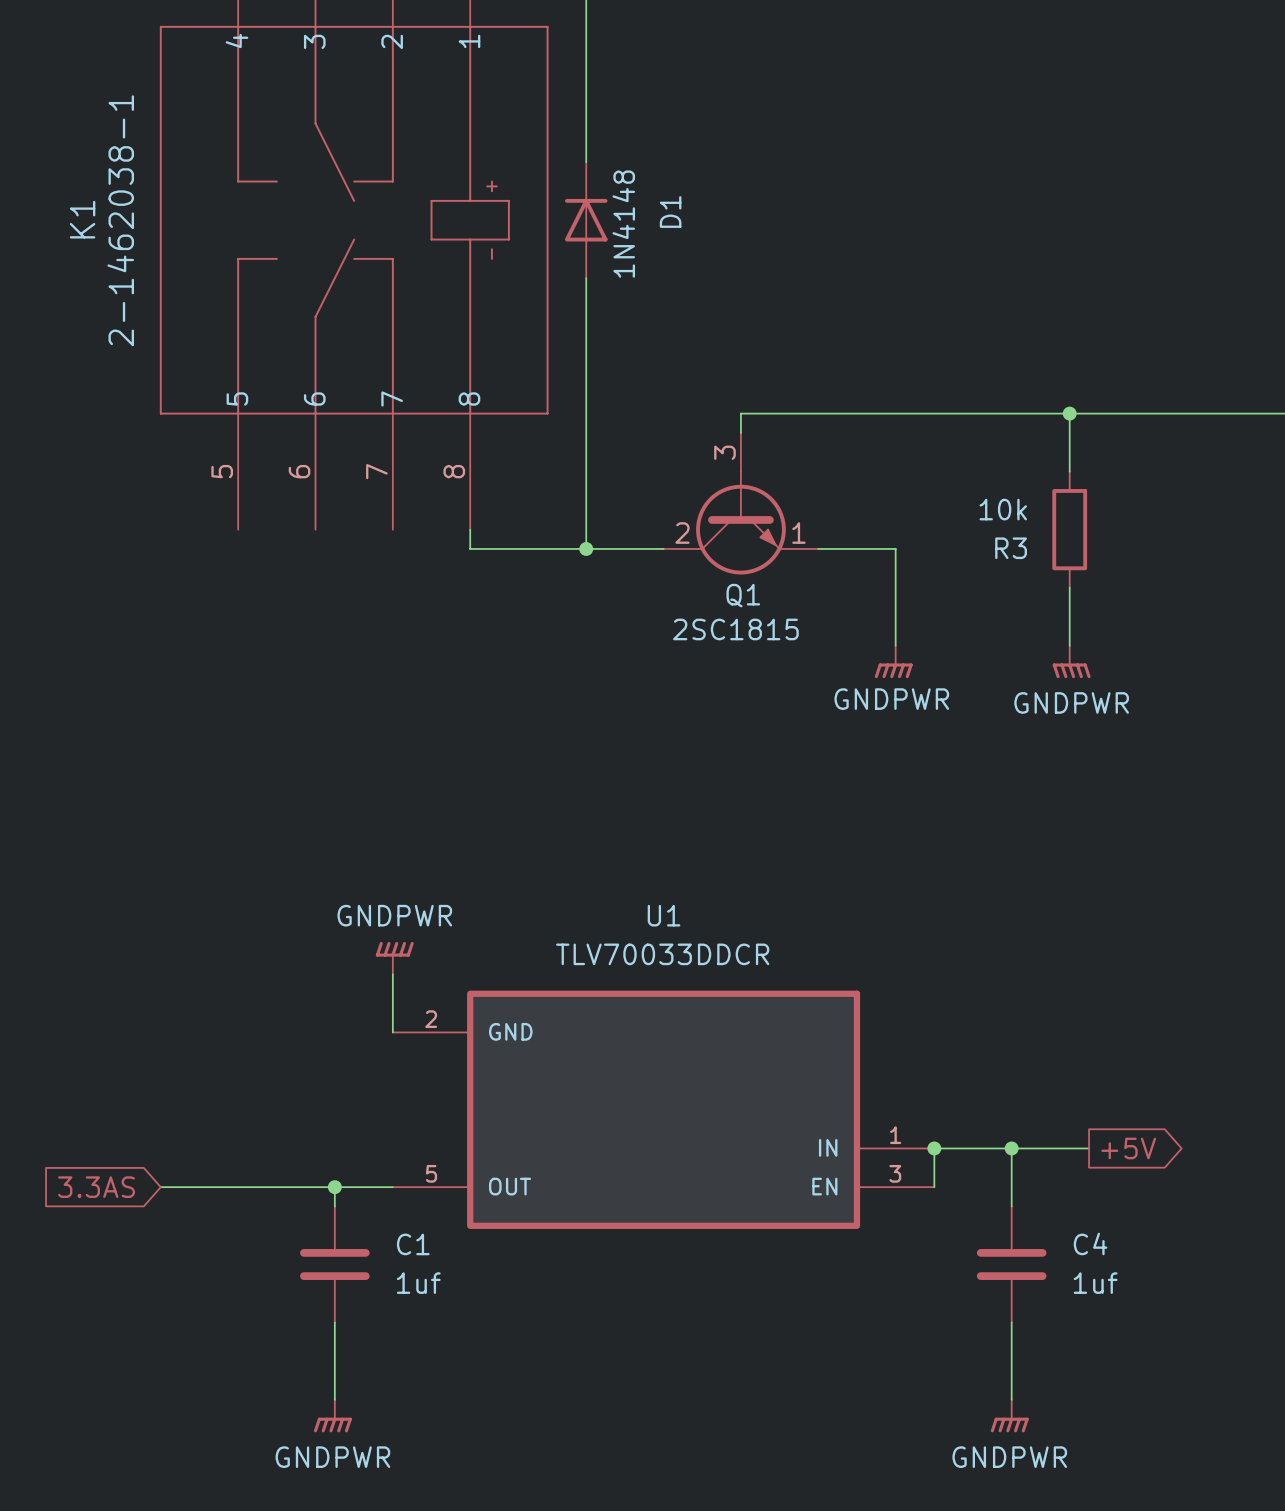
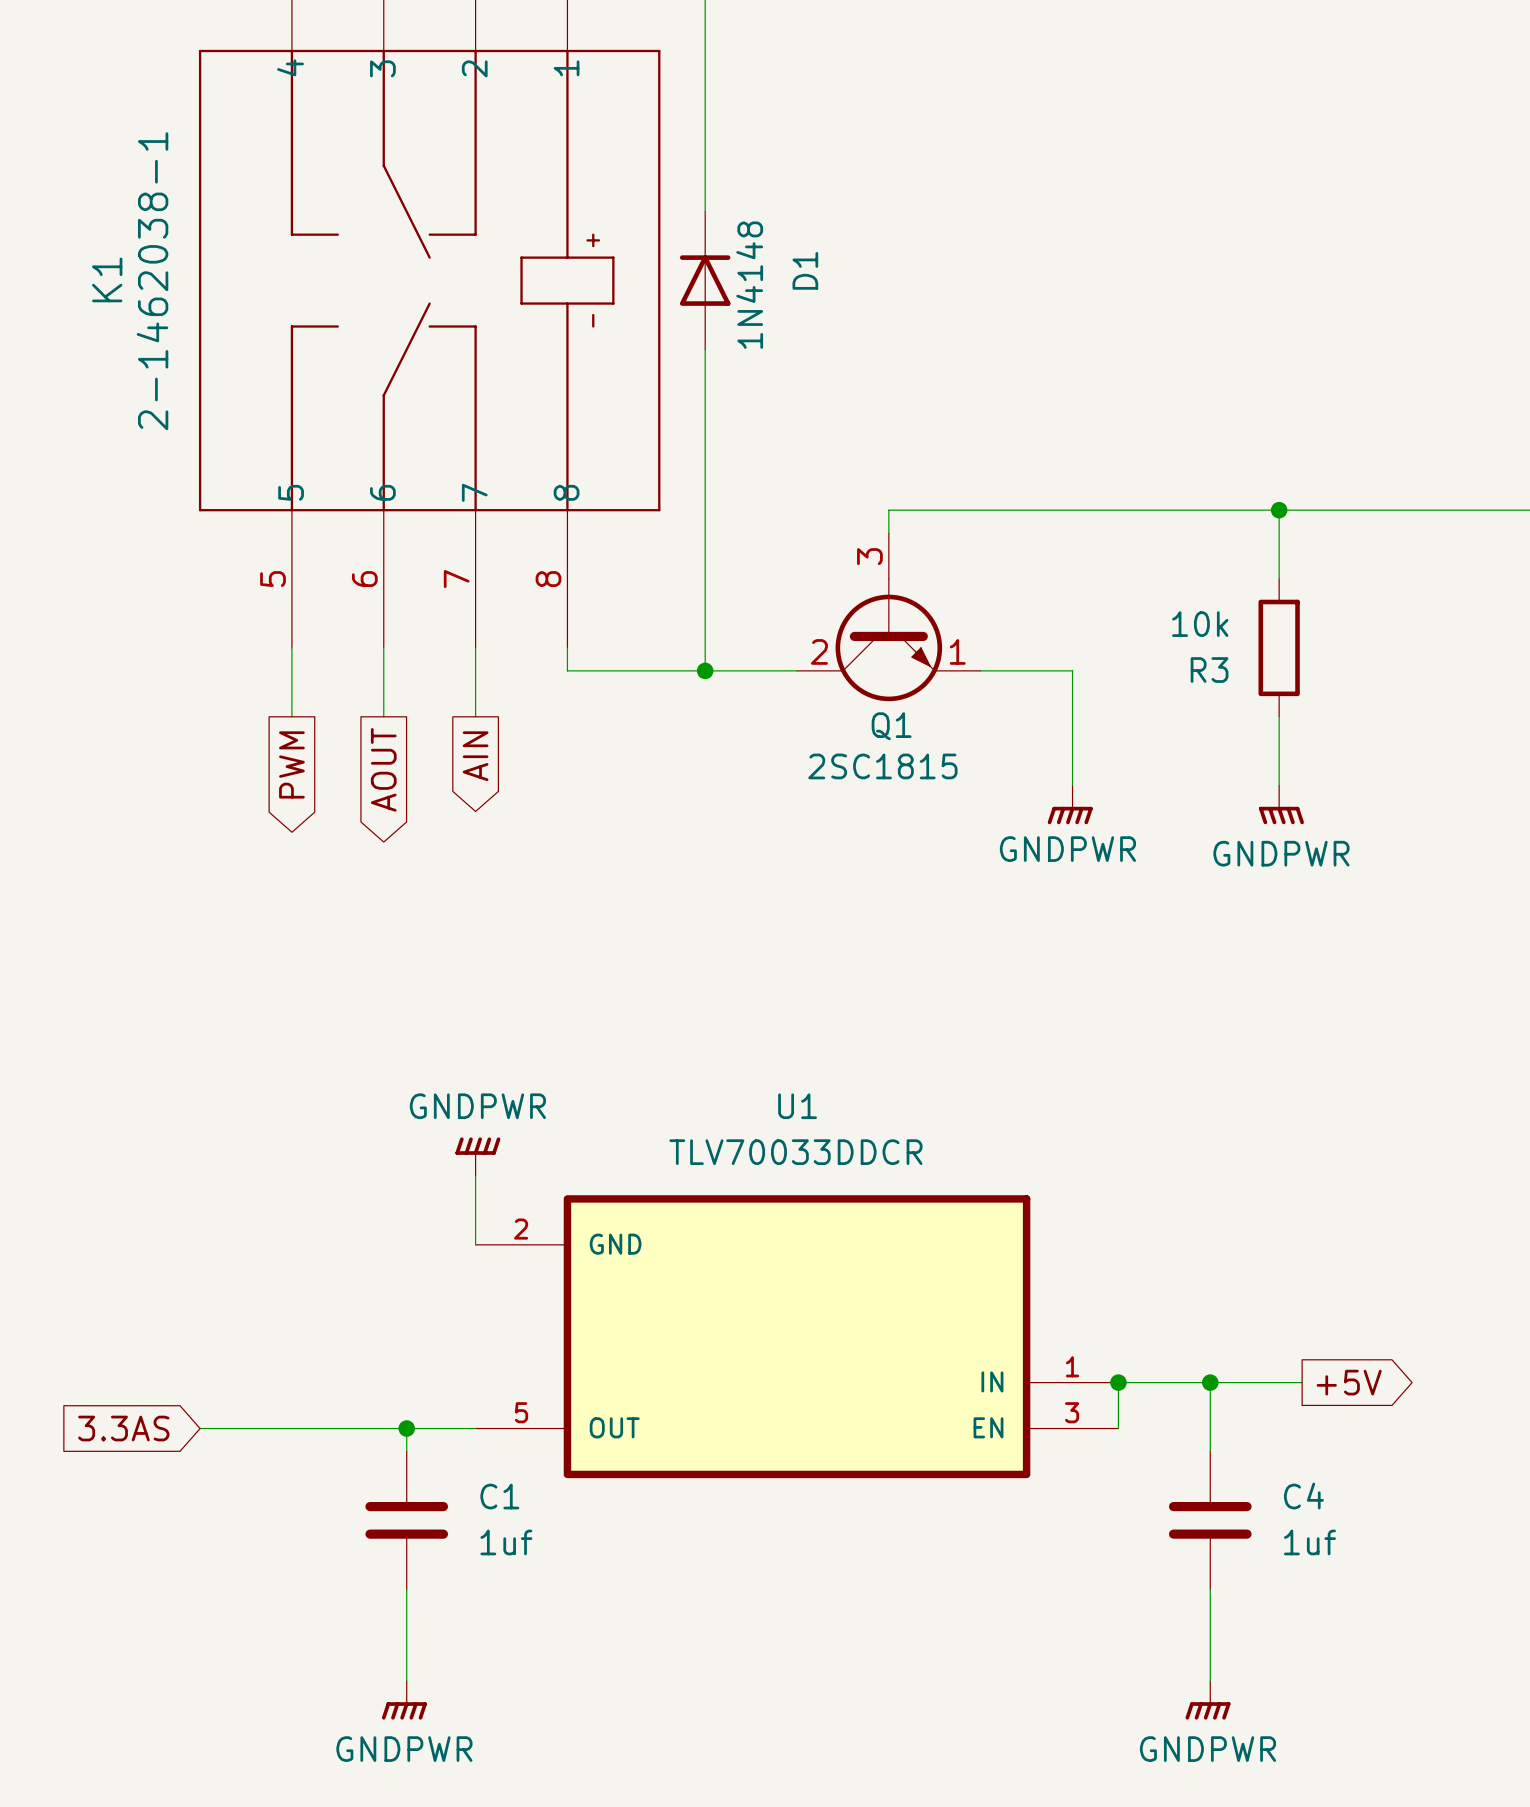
wire: none -> (291, 647) (291, 716)
wire: none -> (383, 647) (383, 716)
wire: none -> (475, 647) (475, 716)
global label: none -> AIN (475, 756)
global label: none -> PWM (291, 764)
global label: none -> AOUT (383, 769)

